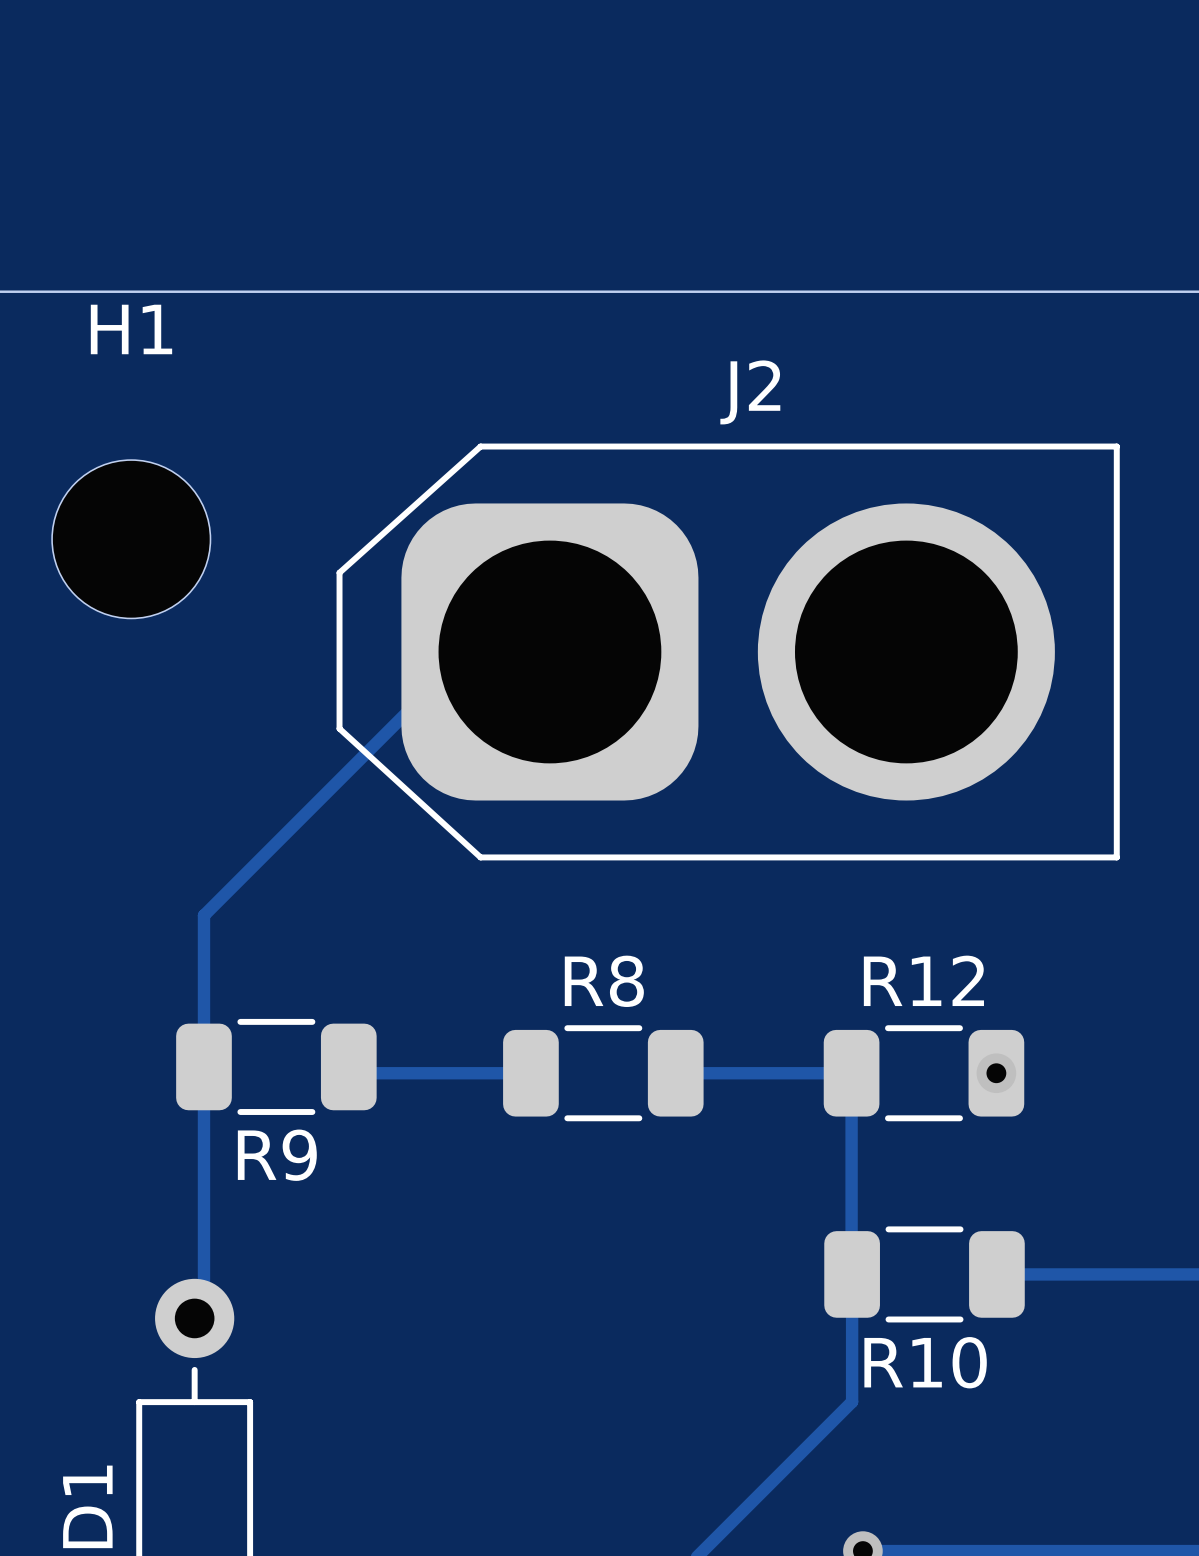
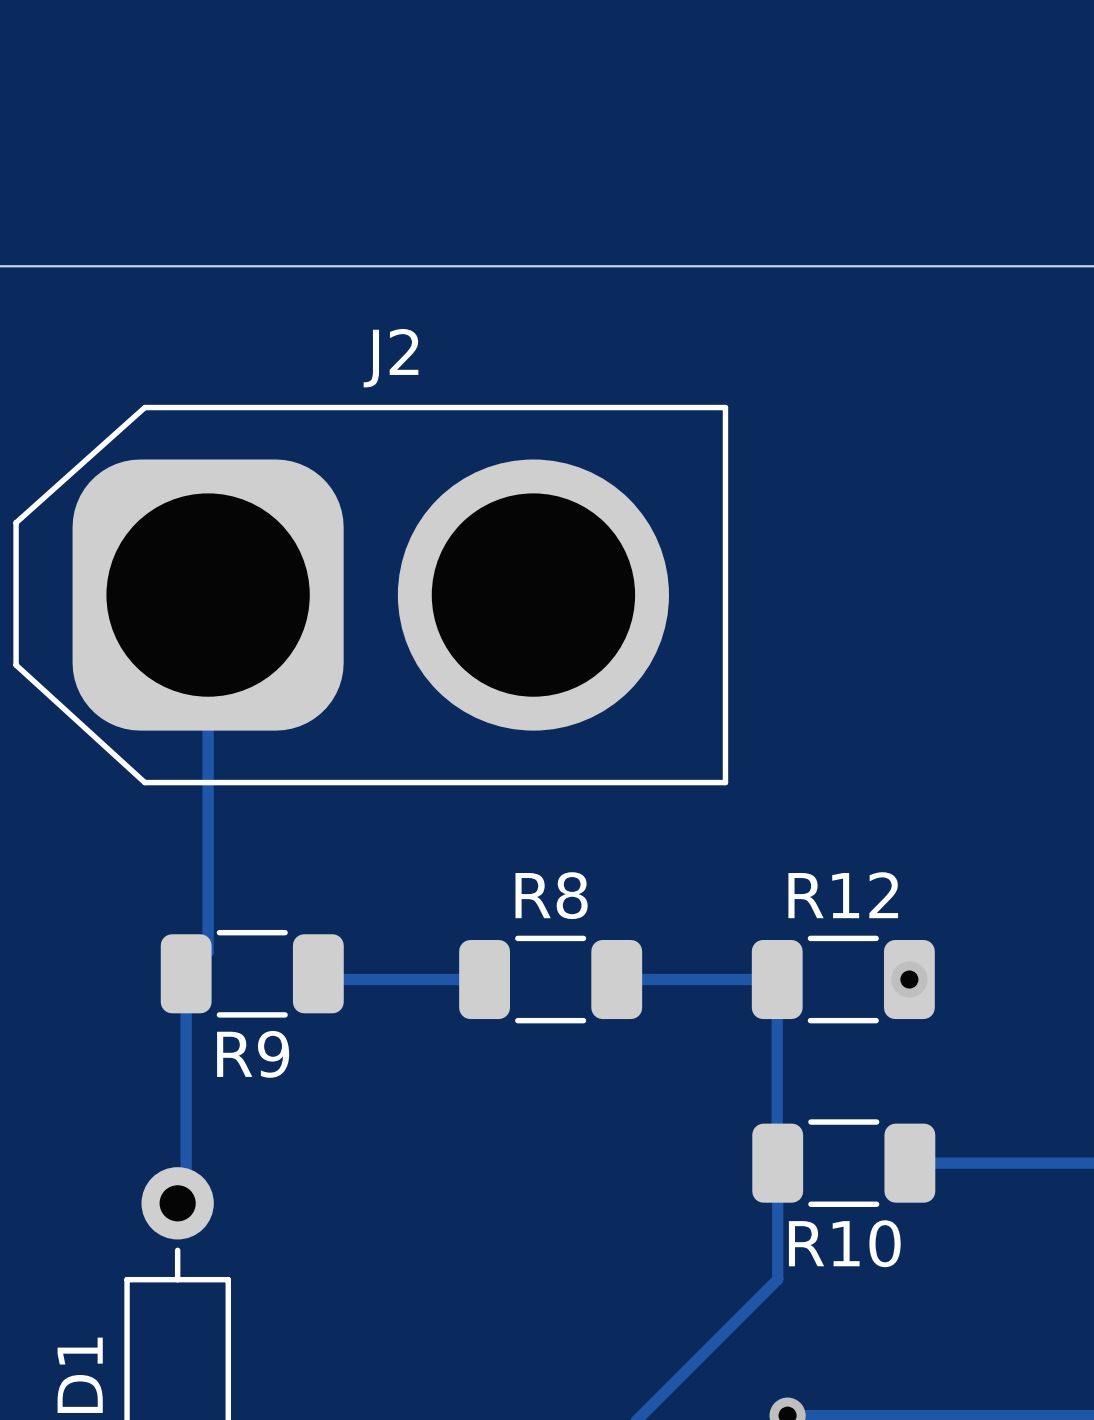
H1: (131, 539) -> none
track: (549, 651) (467, 651) (203, 915) (203, 1066) -> (208, 595) (208, 951) (186, 973)
J2 position: (728, 651) -> (370, 595)

